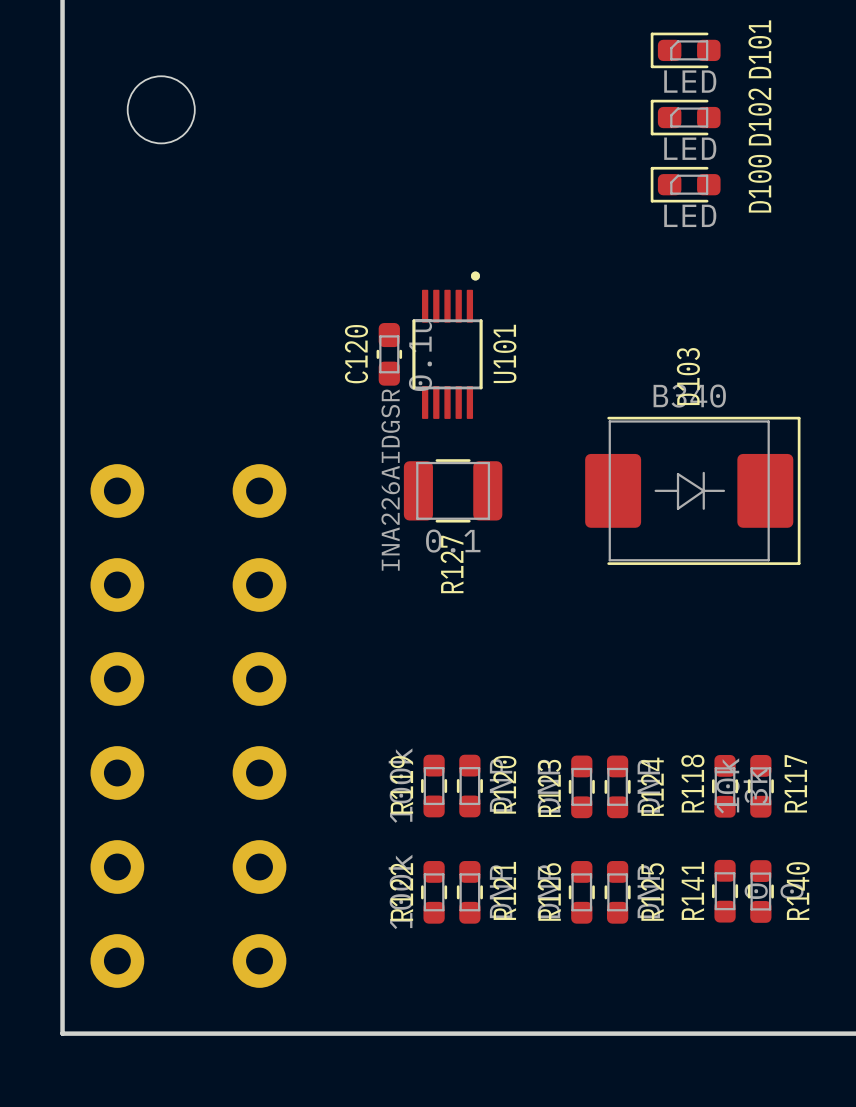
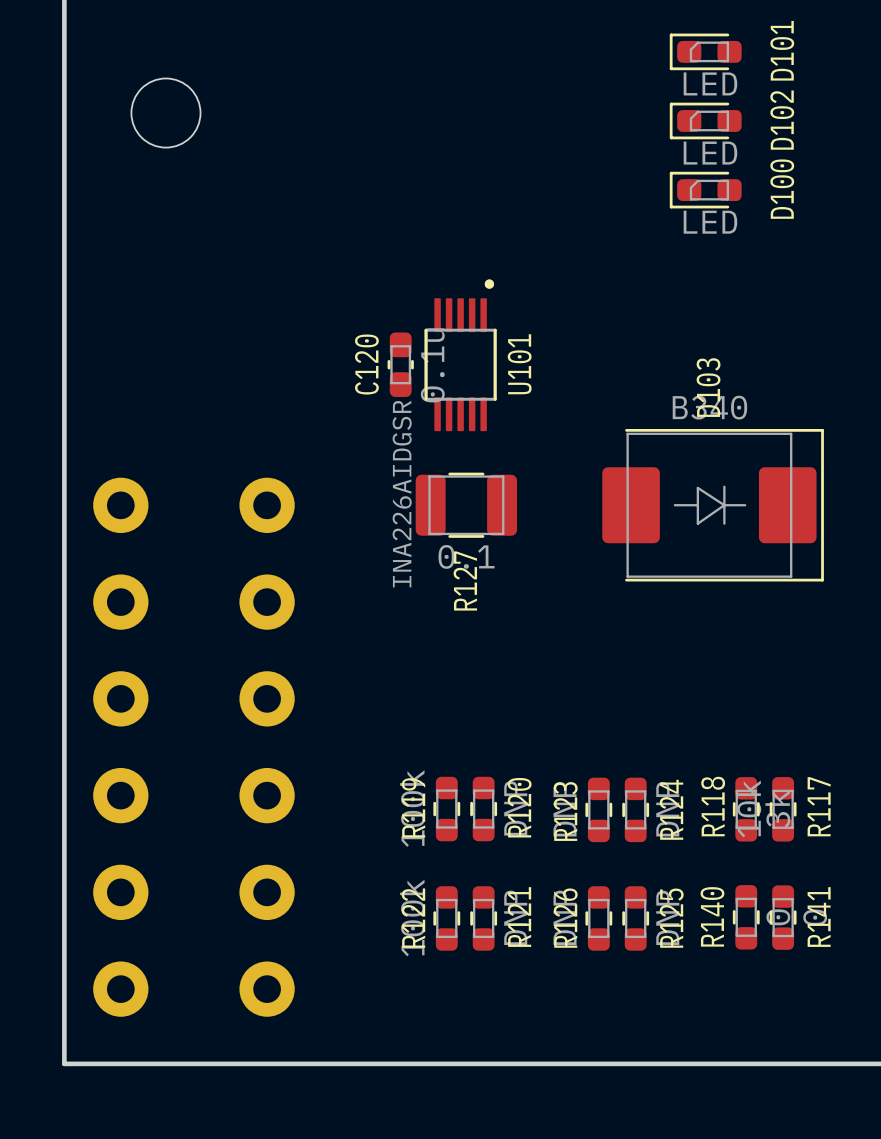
R141 name: R141 (692, 890) -> R140 (712, 916)
R140 name: R140 (798, 891) -> R141 (819, 917)

